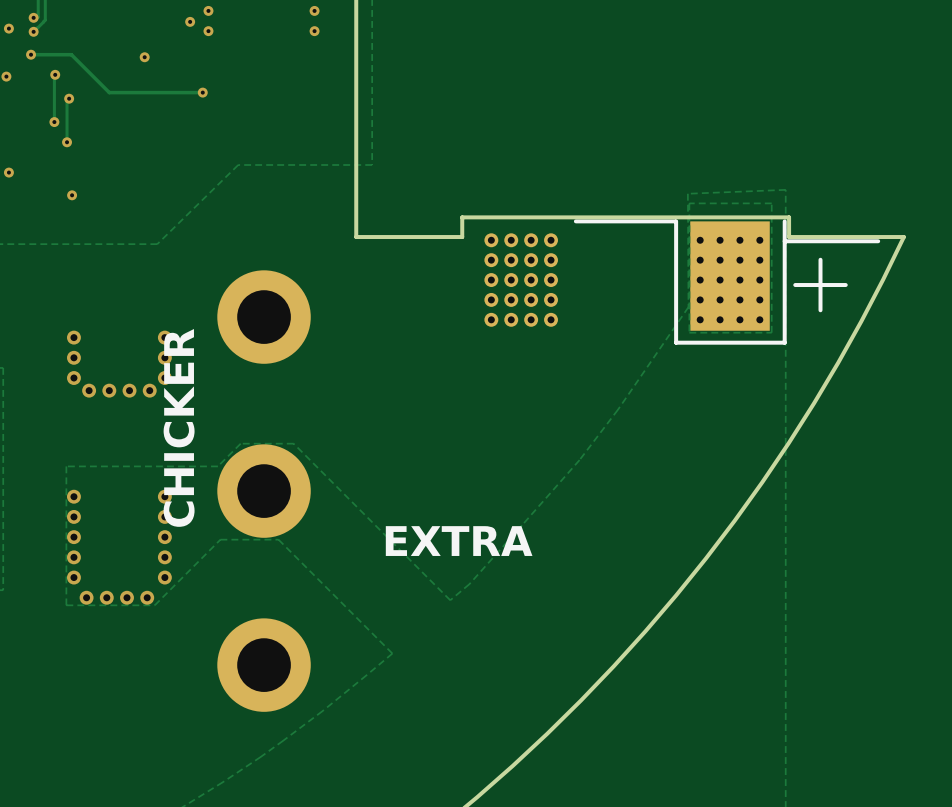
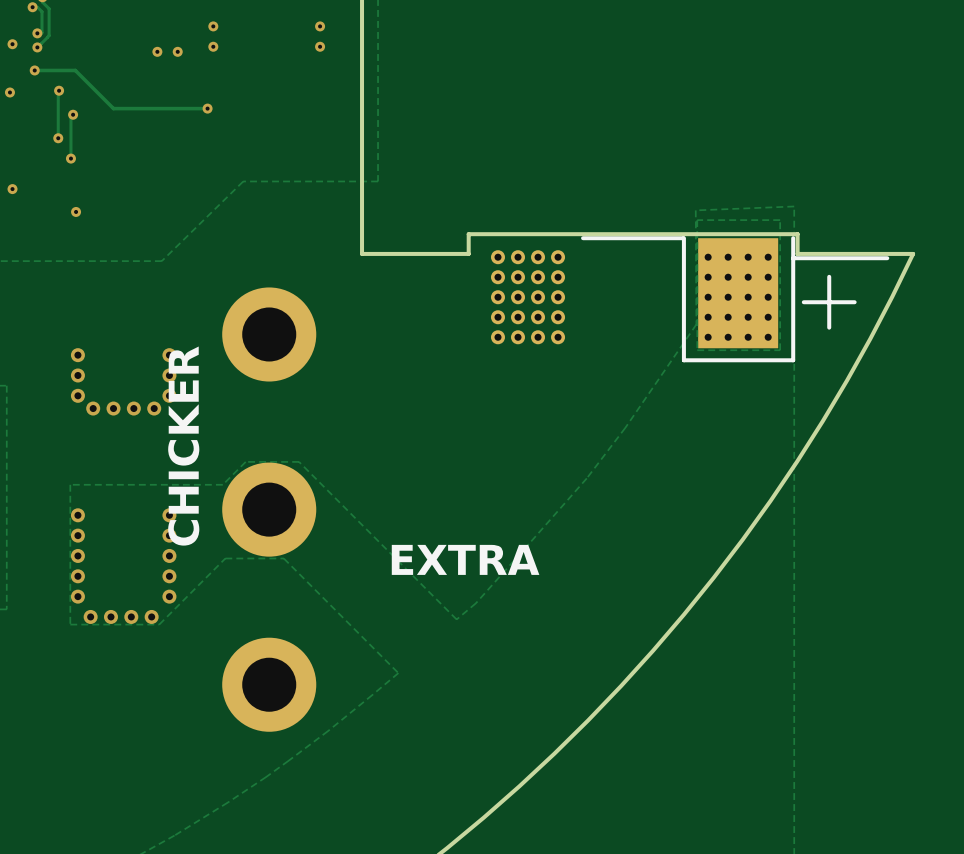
via: (190, 21) -> none
via: none -> (157, 51)
via: none -> (177, 51)
via: (144, 57) -> none

